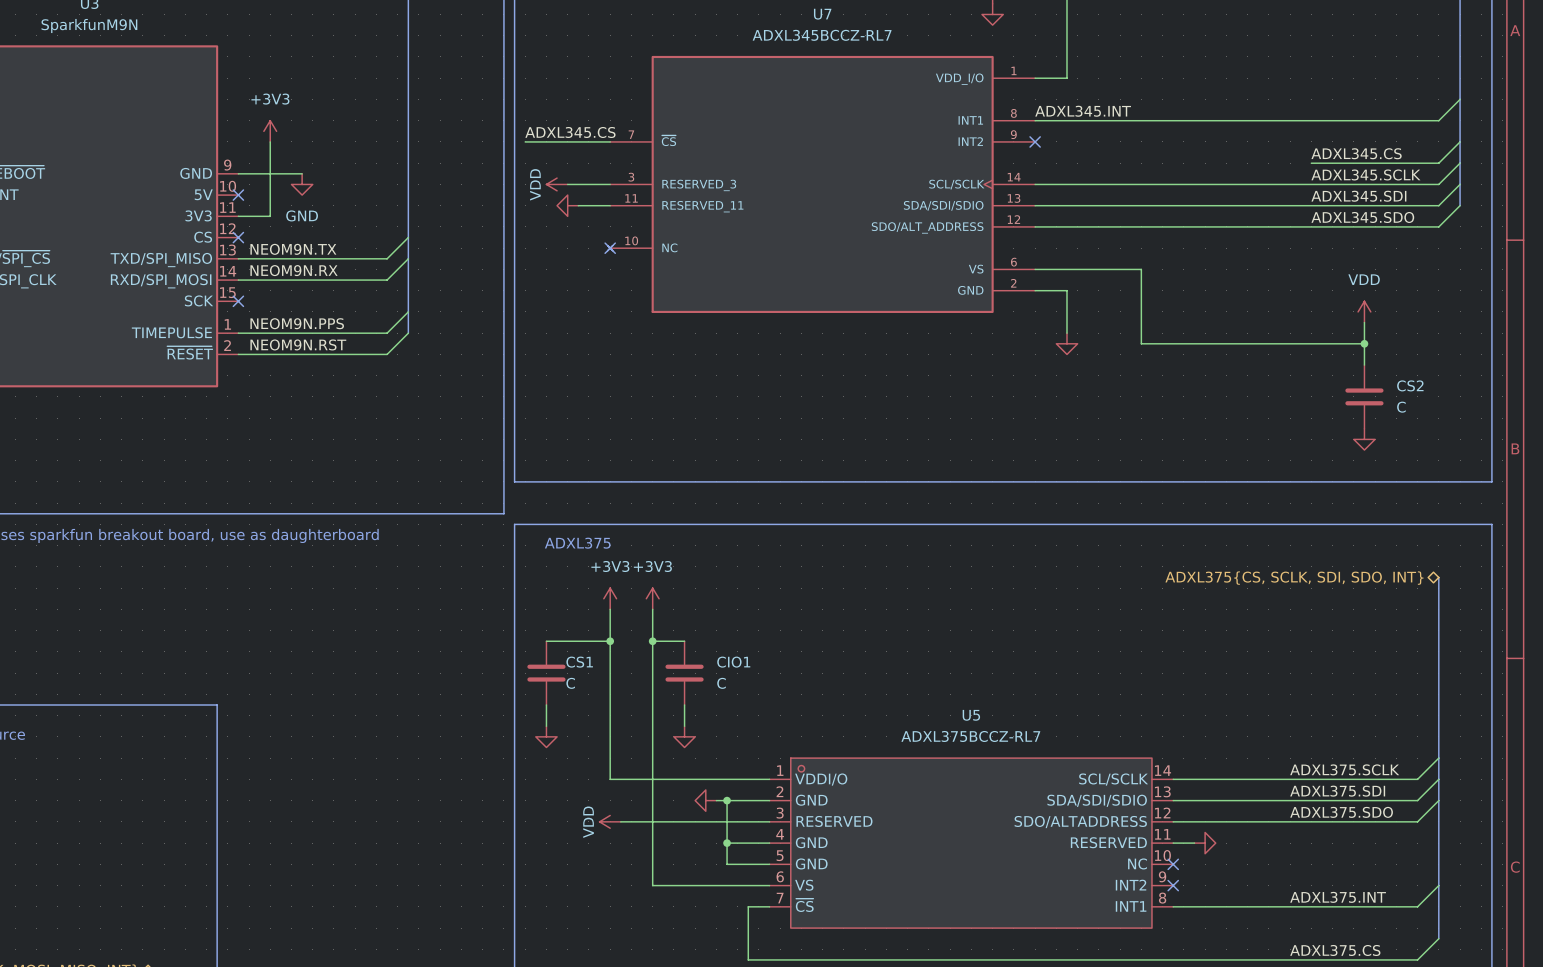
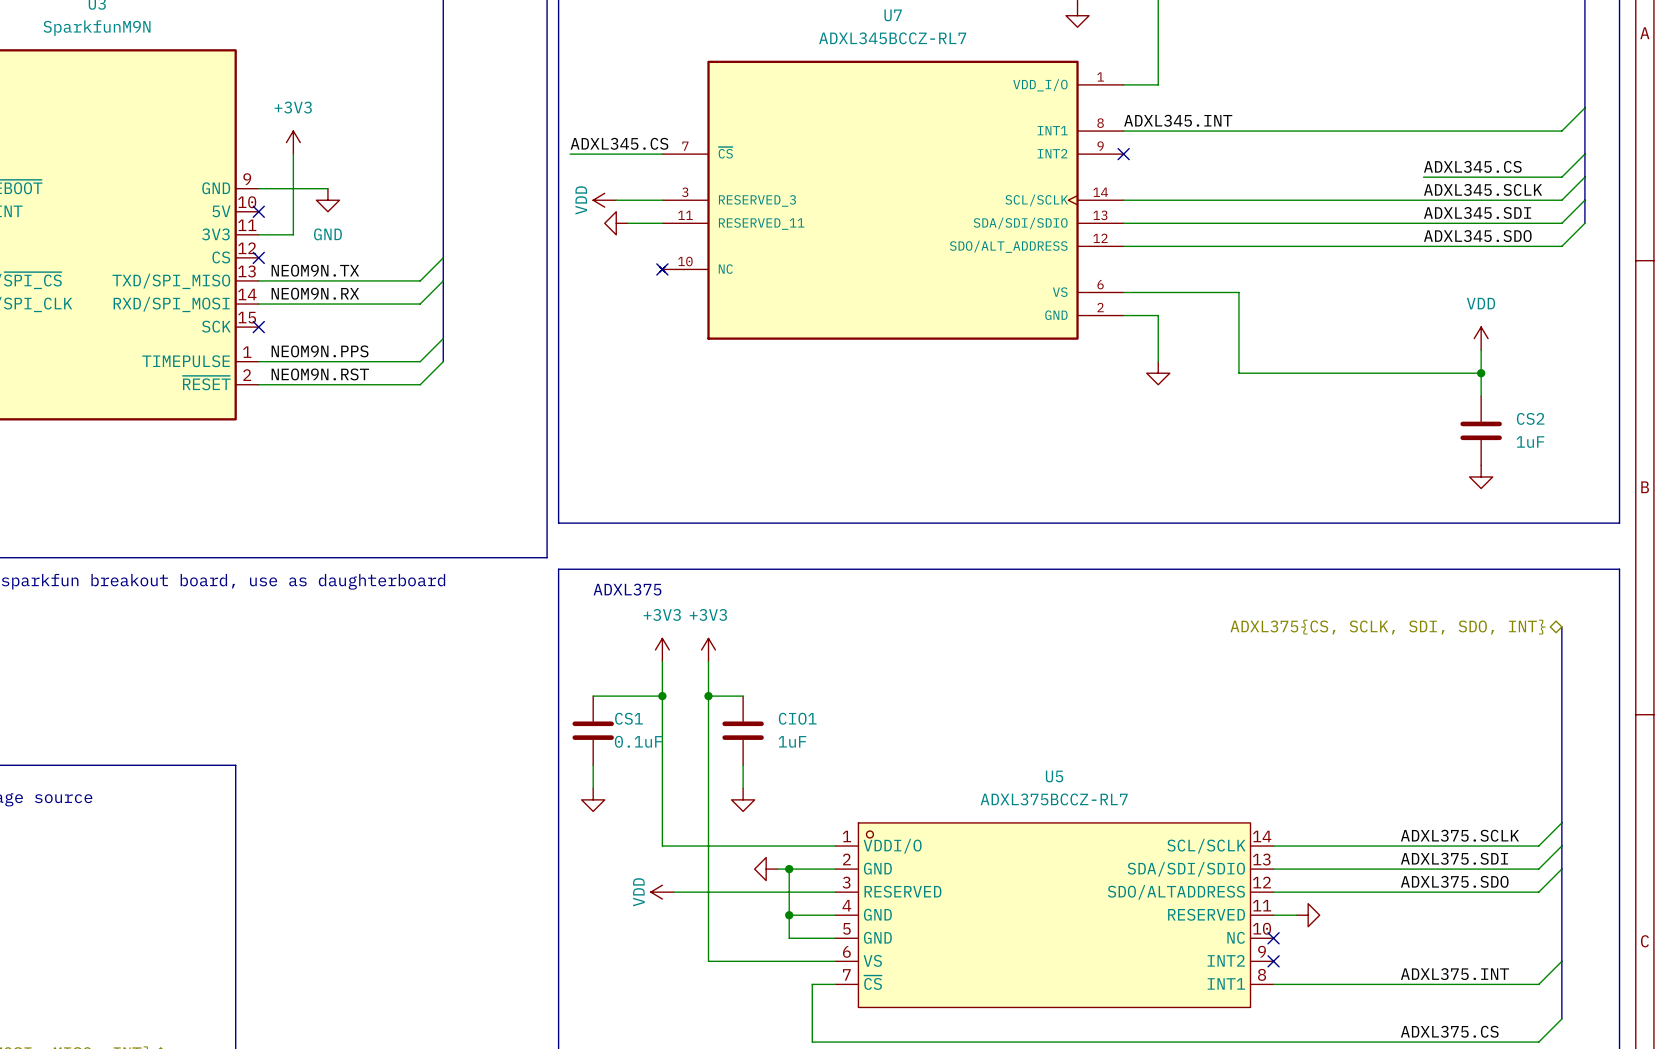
CS2 value: C (1401, 407) -> 1uF (1530, 442)
CS1 value: C (570, 683) -> 0.1uF (638, 741)
CIO1 value: C (721, 683) -> 1uF (792, 741)

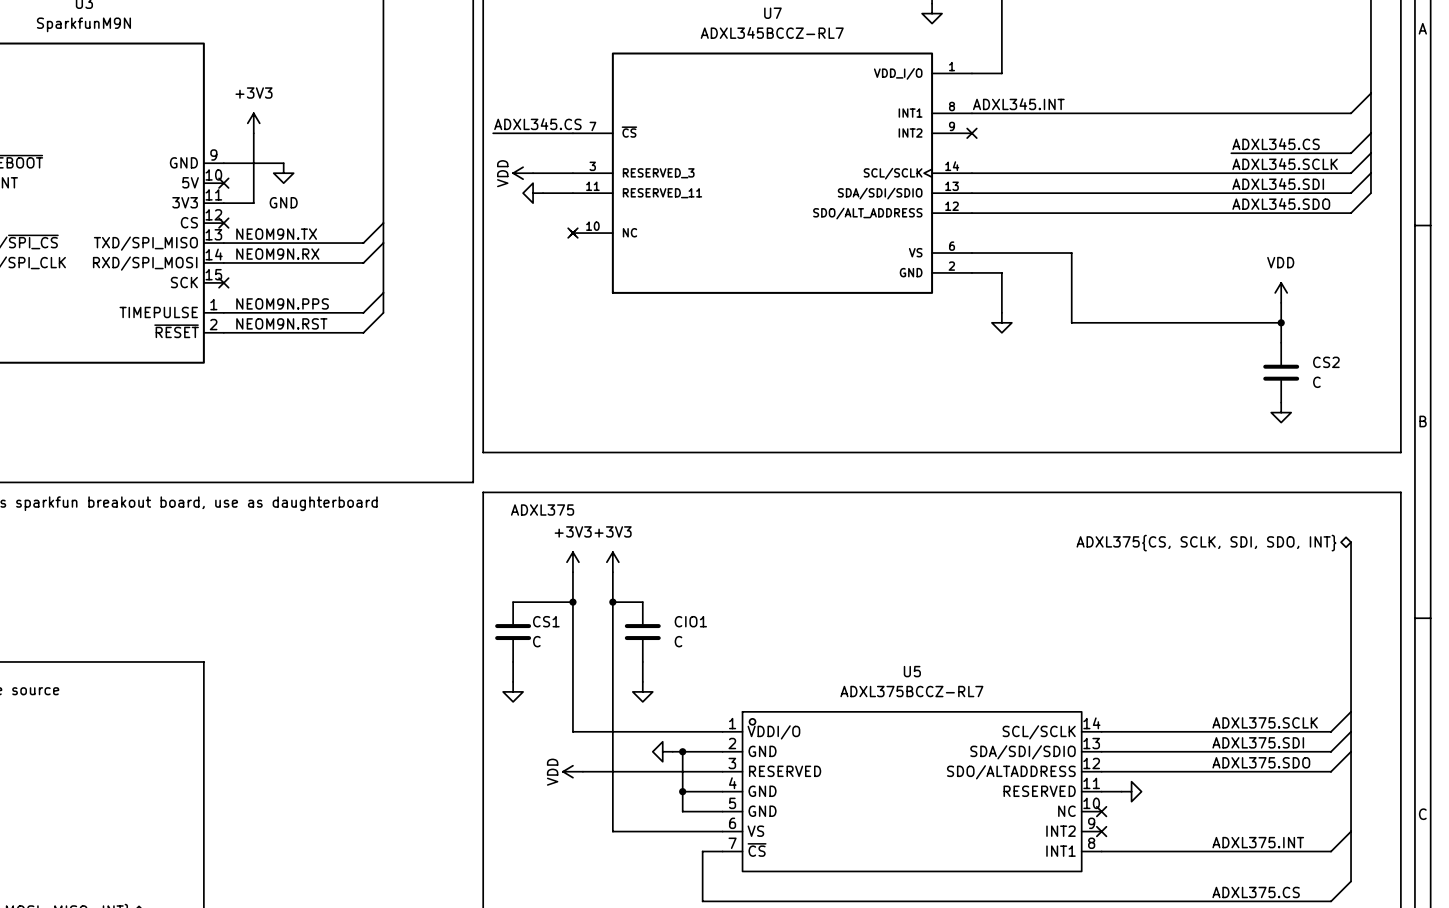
CS2 value: 1uF (1530, 442) -> C (1316, 382)
CS1 value: 0.1uF (638, 741) -> C (536, 641)
CIO1 value: 1uF (792, 741) -> C (678, 641)

